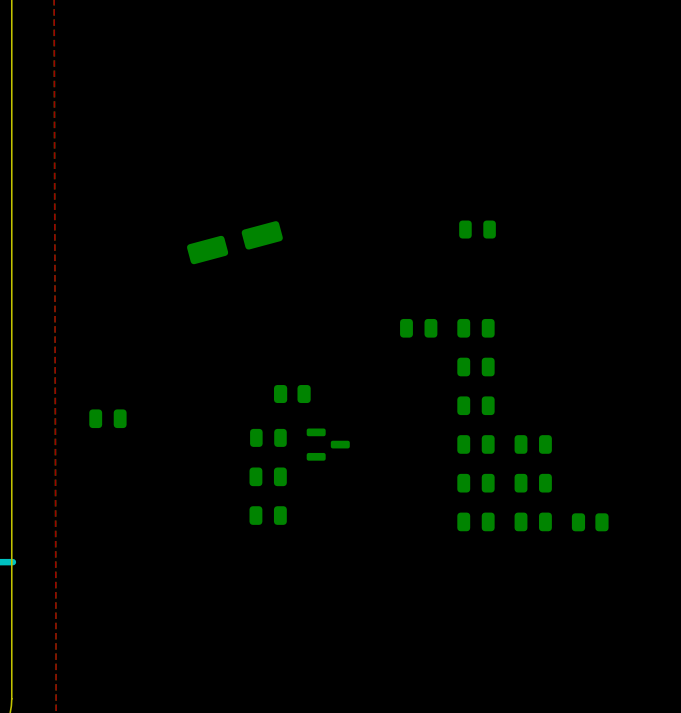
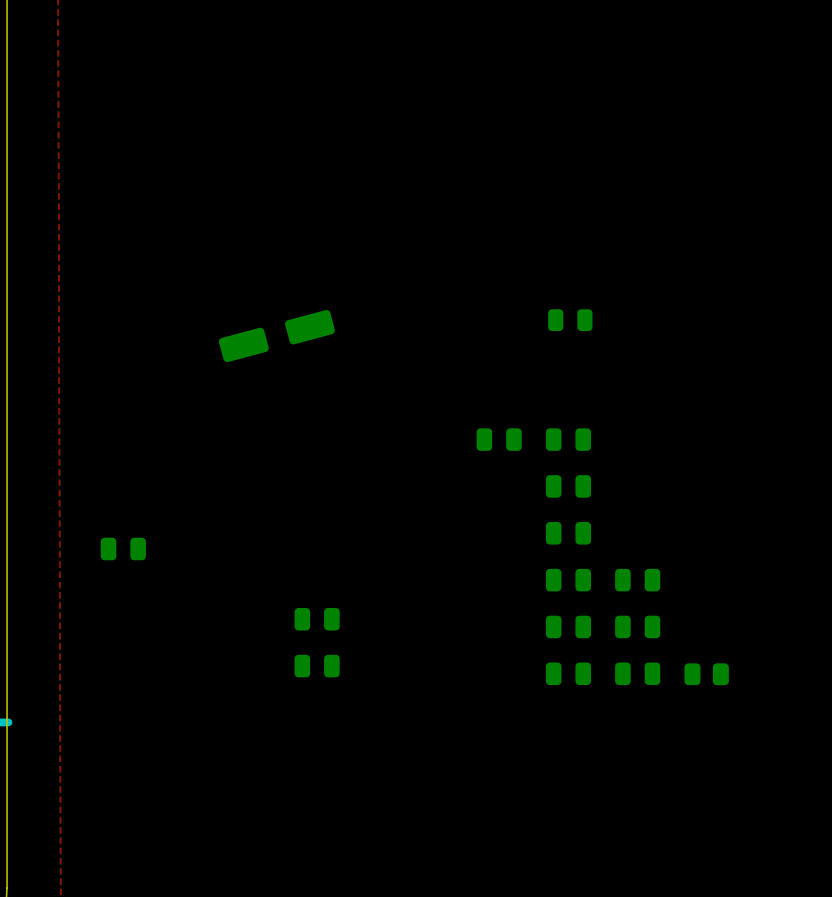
part: (292, 394) -> none
part: (268, 437) -> none
part: (328, 444) -> none

